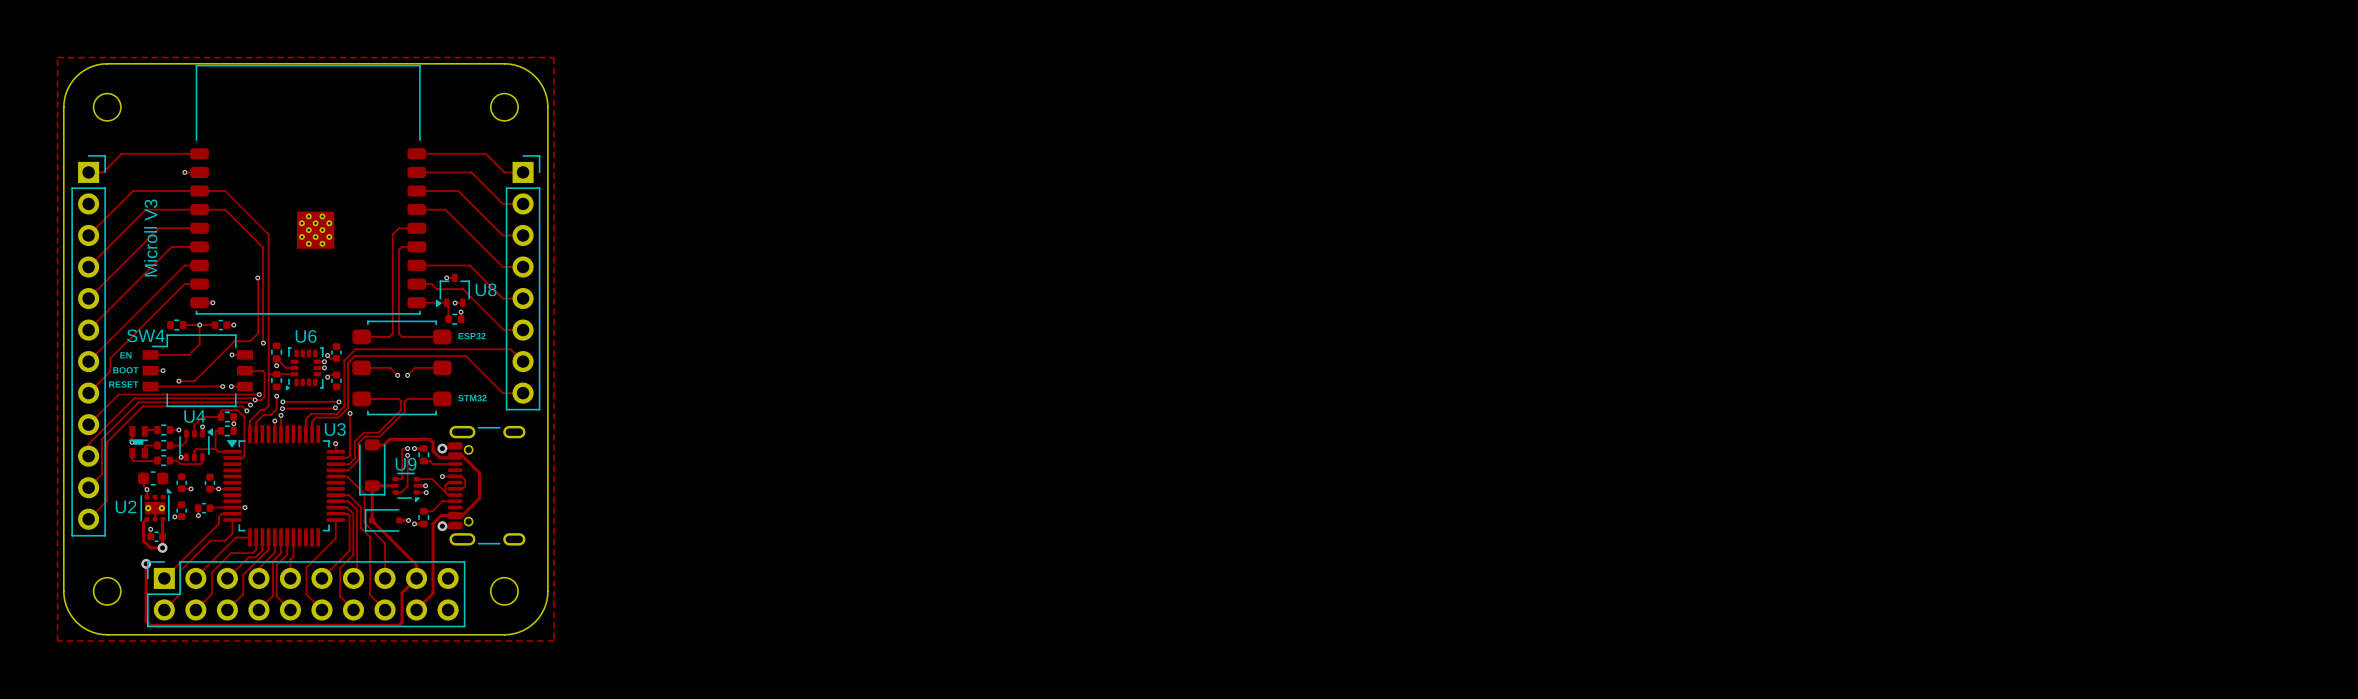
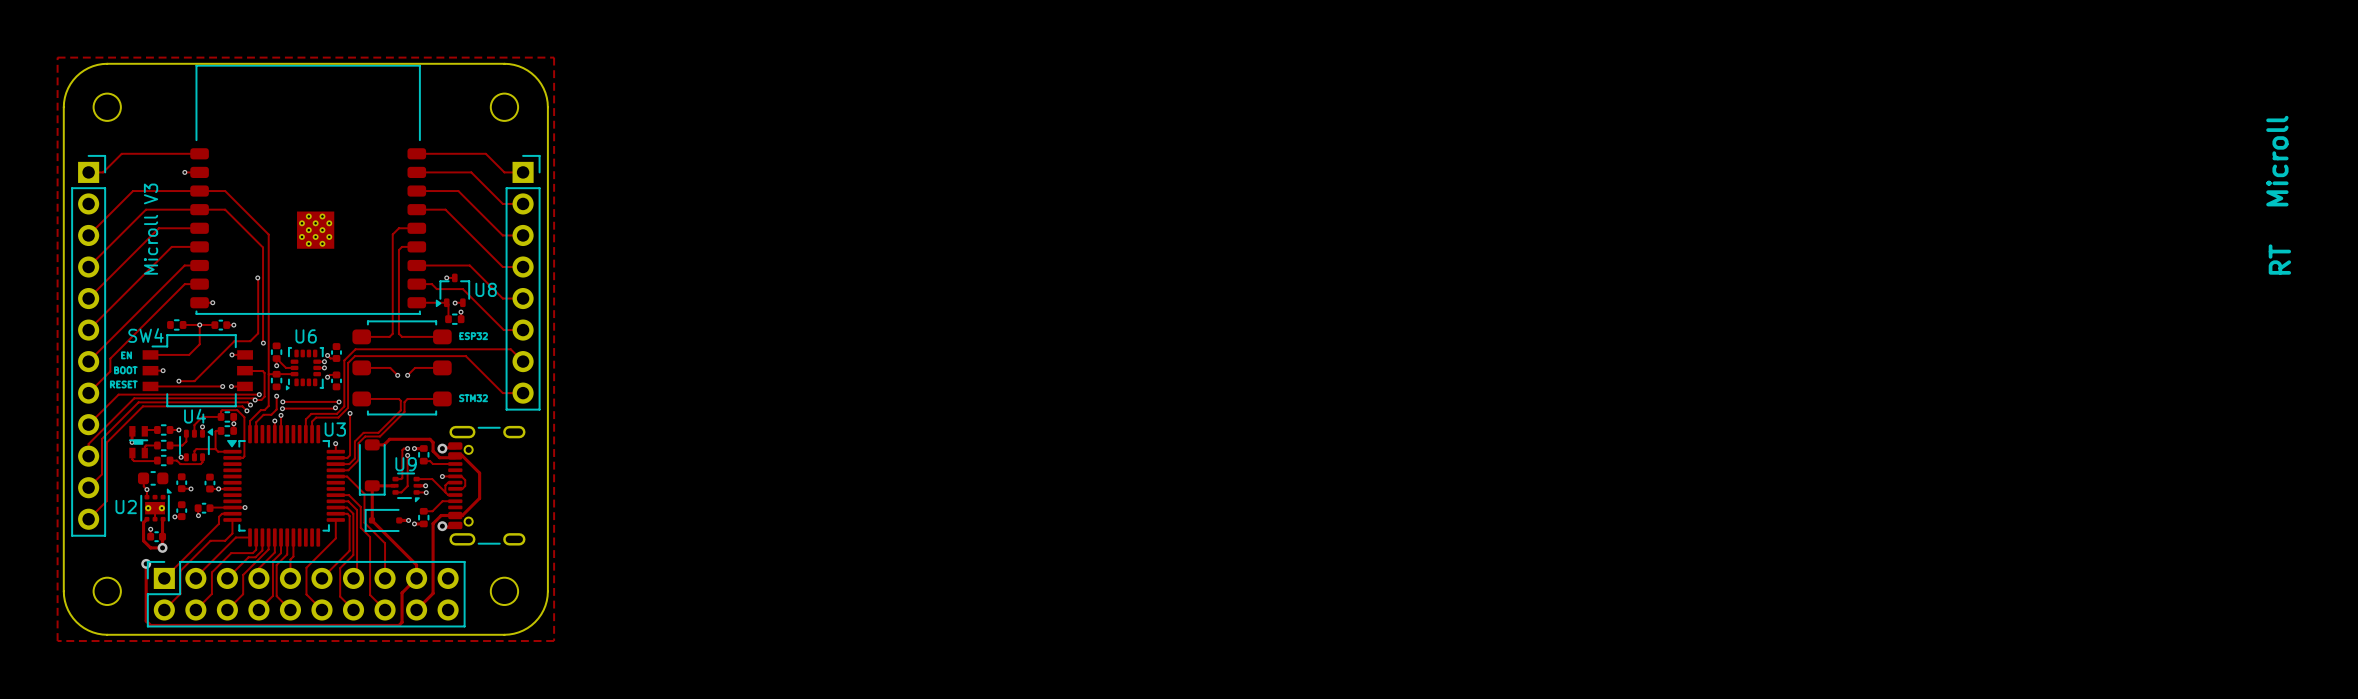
text: none -> Microll (2277, 161)
text: none -> RT (2279, 259)

